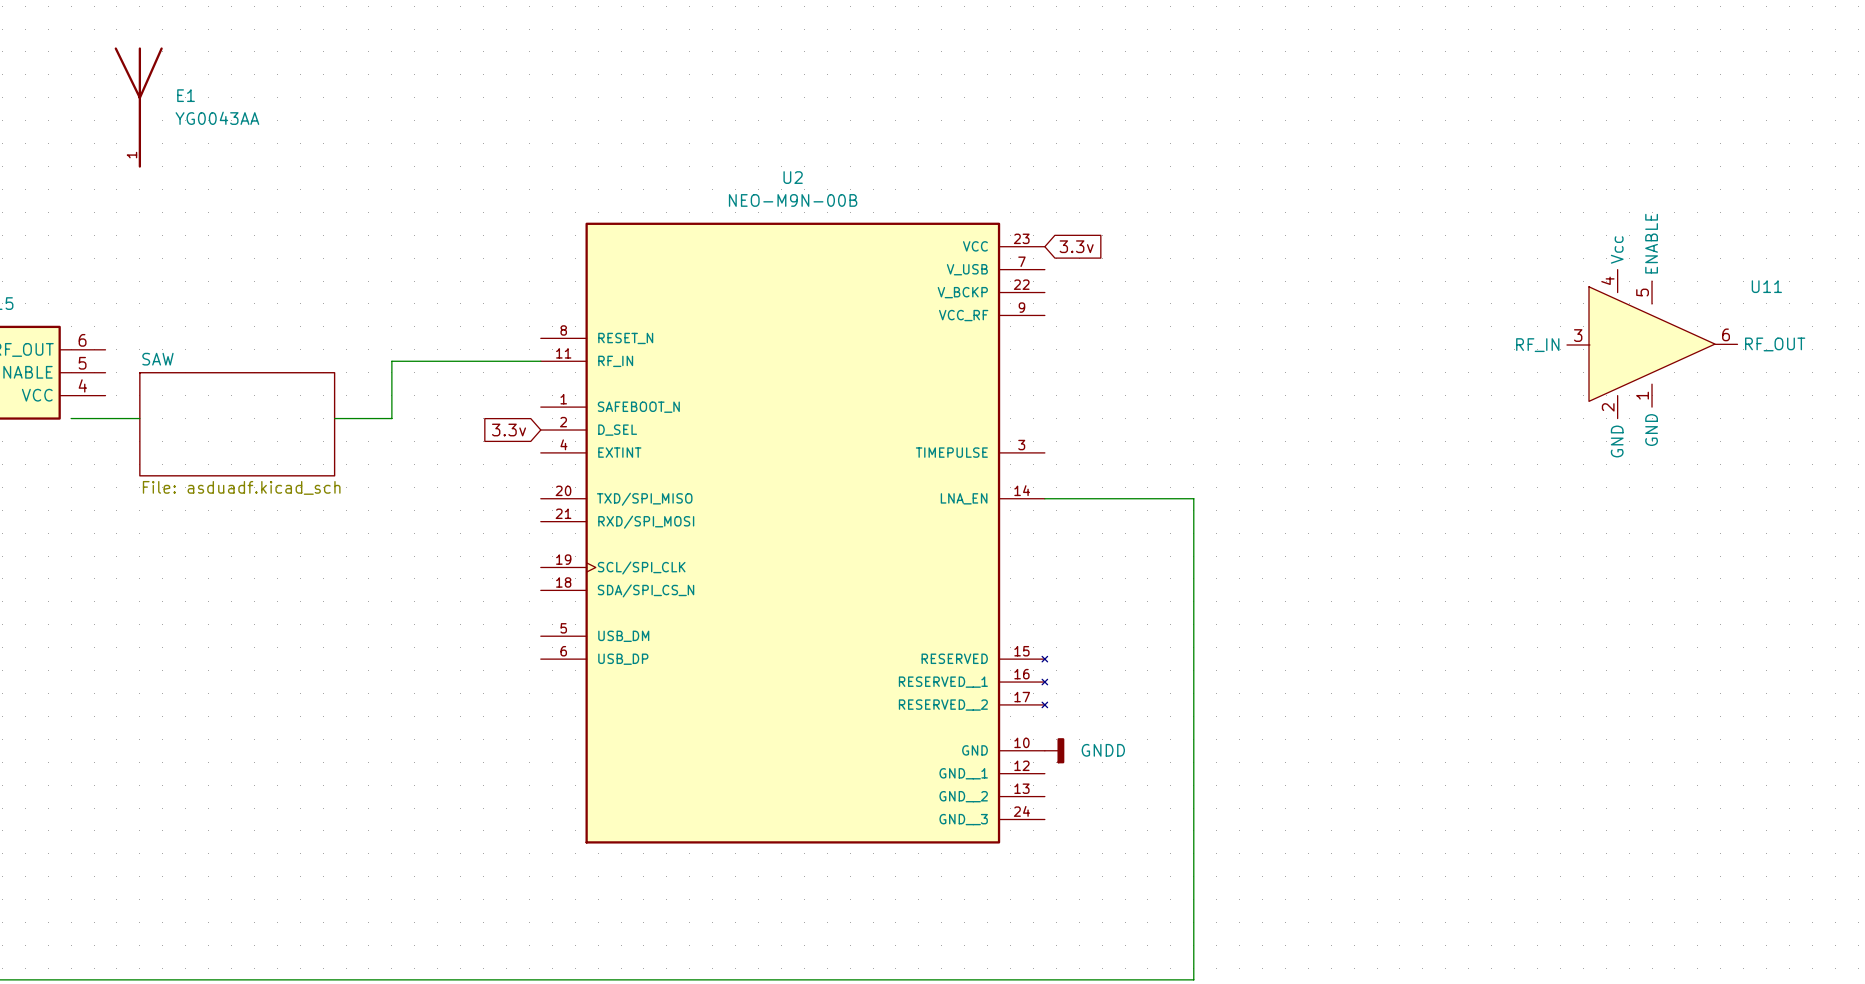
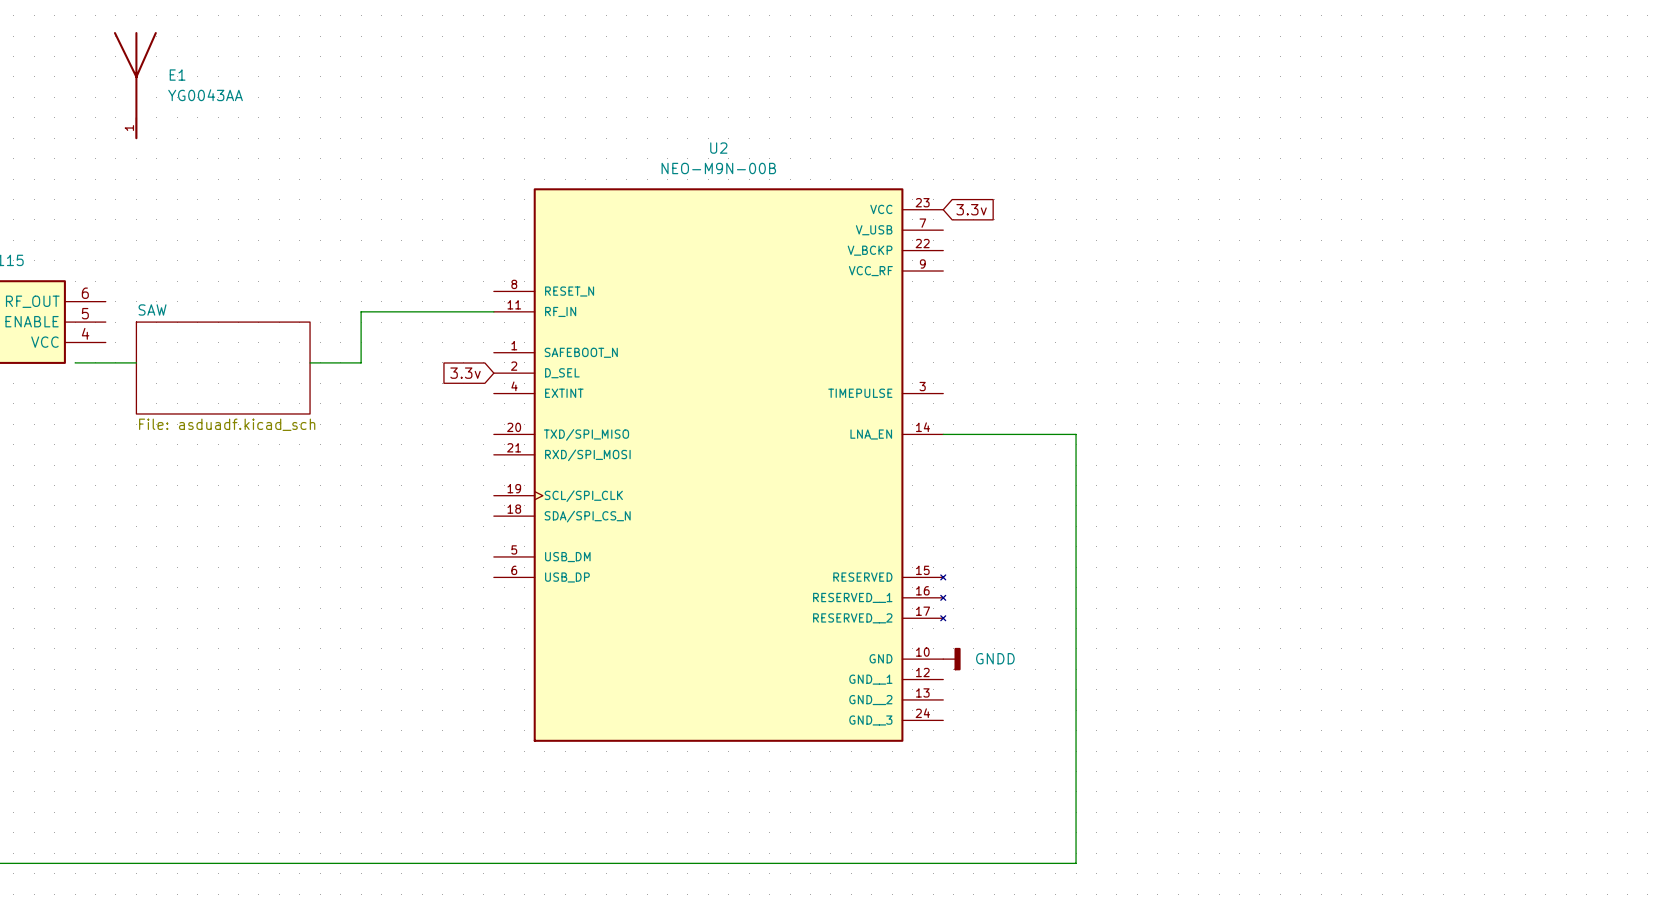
U11: (1652, 344) -> none

